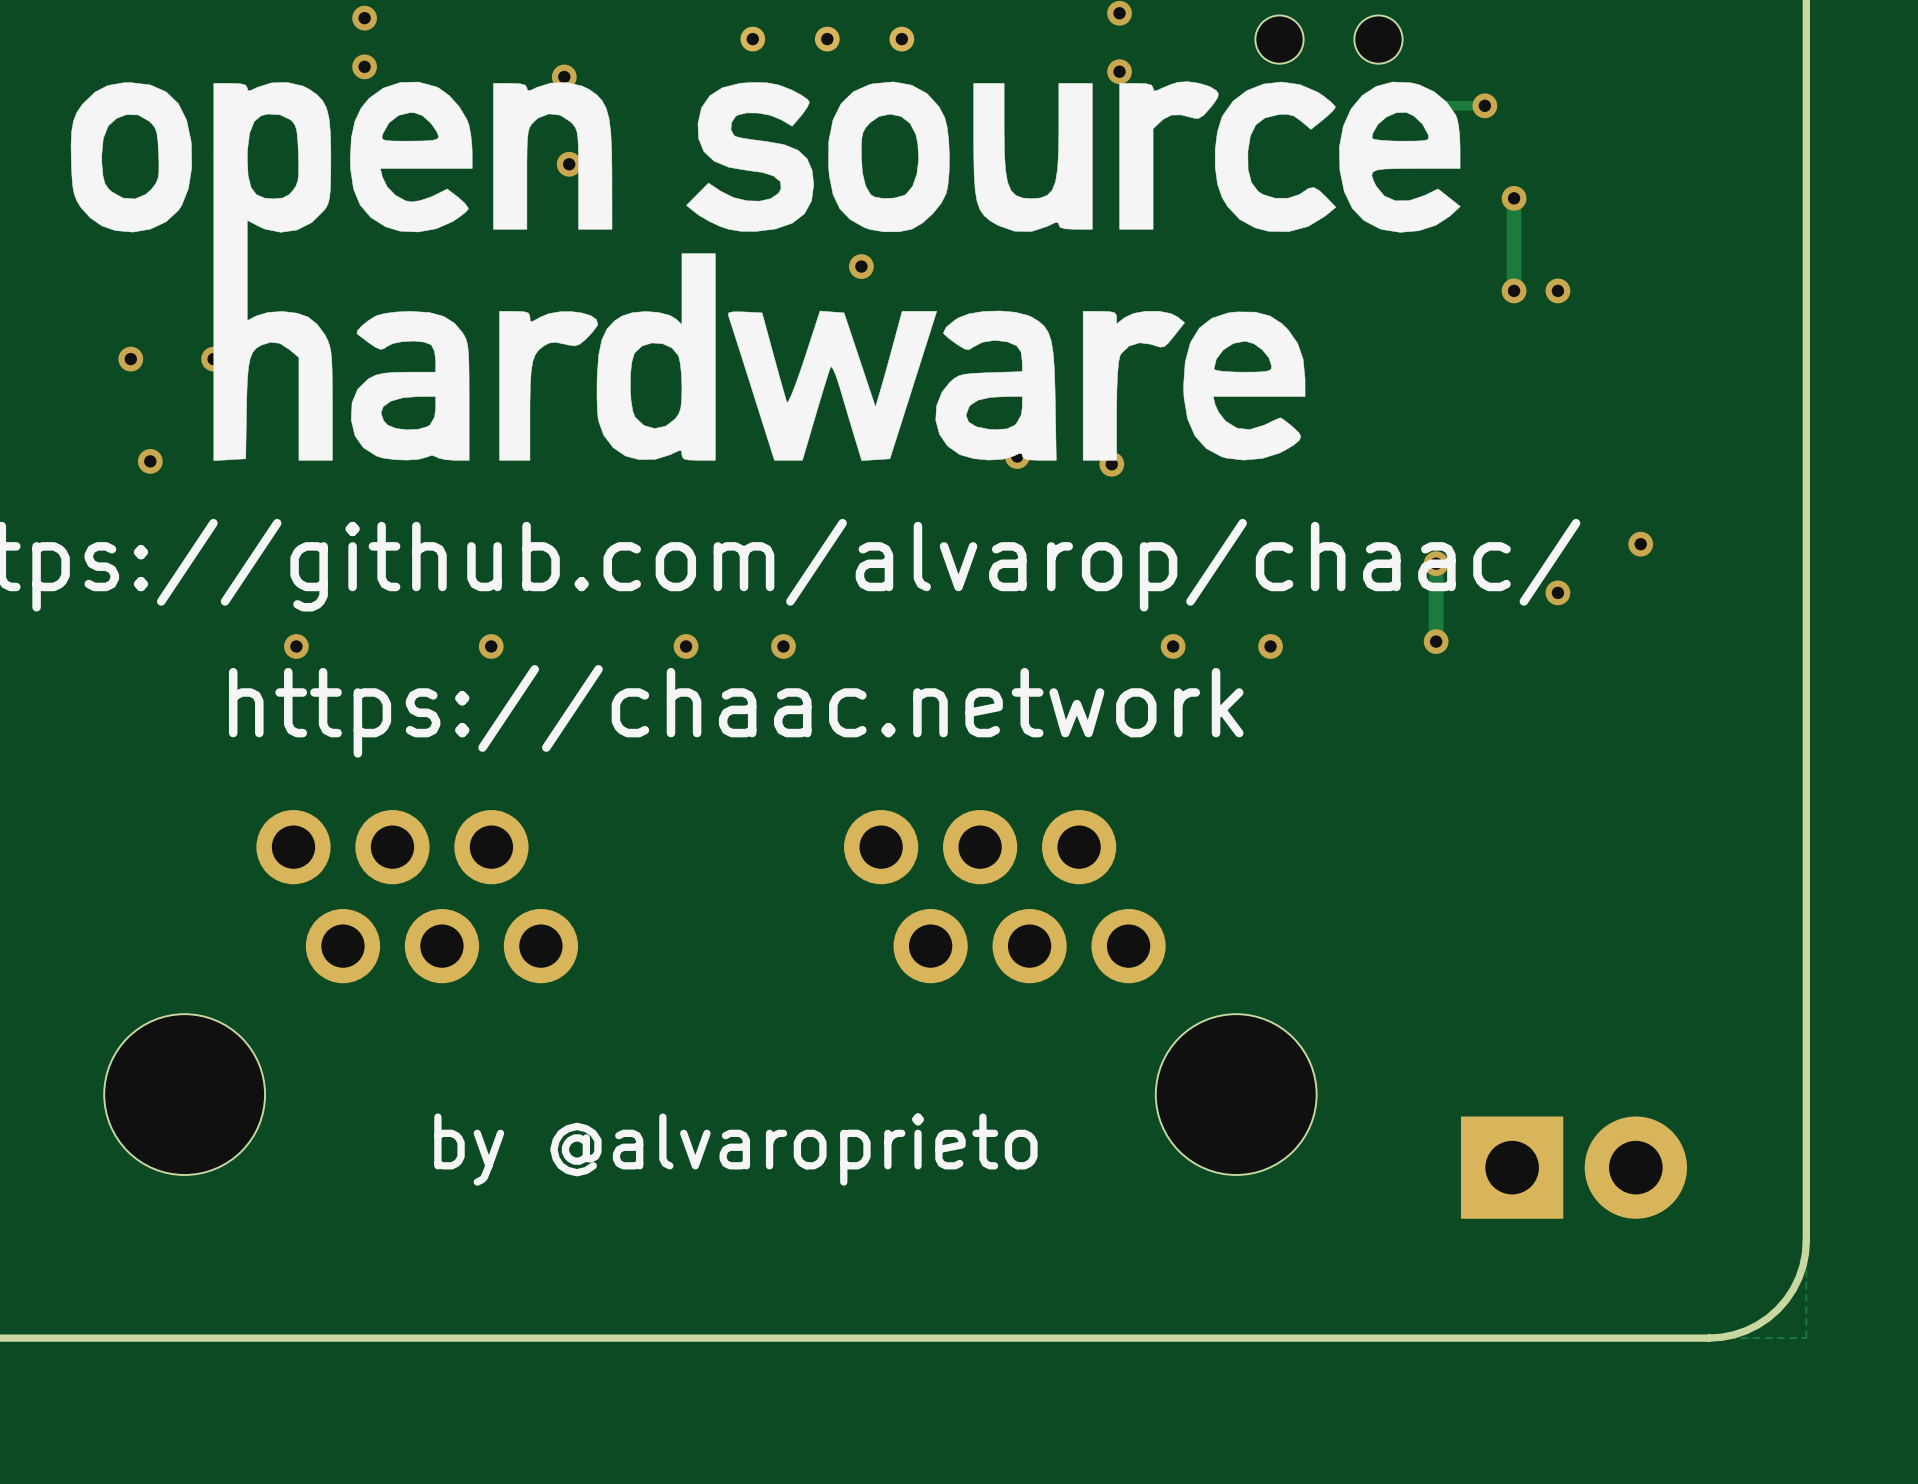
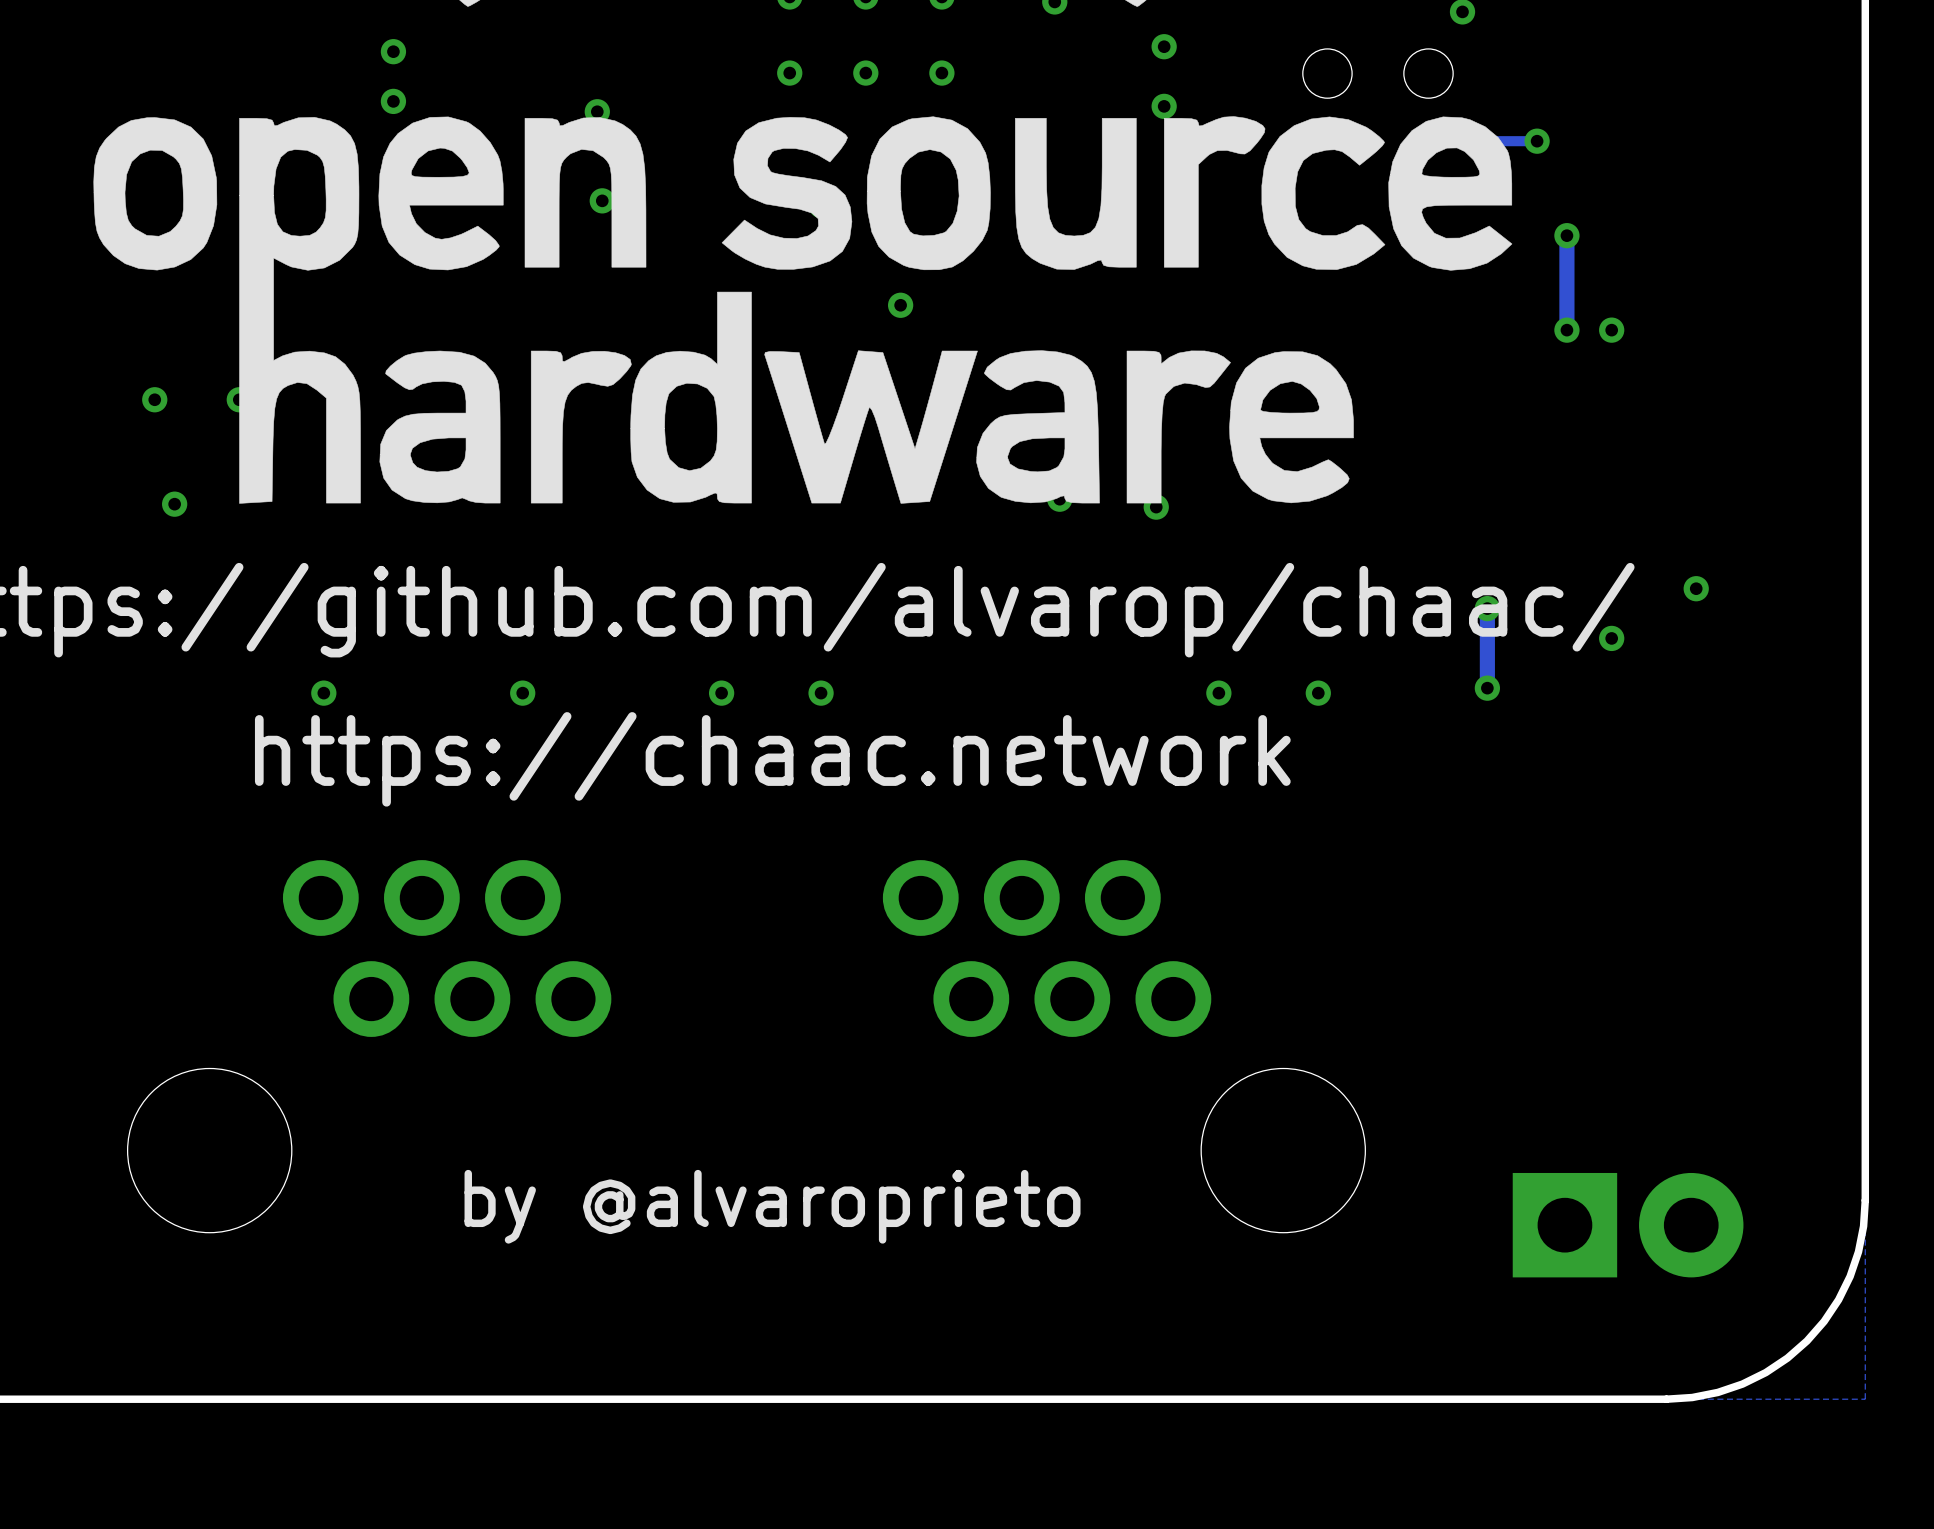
board edge: (1806, 1143) (1805, 1253) (1803, 1265) (1793, 1289) (1777, 1309) (1768, 1317) (1746, 1330) (1721, 1337) (1611, 1338) -> (1865, 1200) (1863, 1226) (1858, 1251) (1850, 1276) (1838, 1299) (1824, 1321) (1807, 1340) (1787, 1358) (1765, 1372) (1742, 1384) (1717, 1392) (1692, 1397) (1666, 1399)

